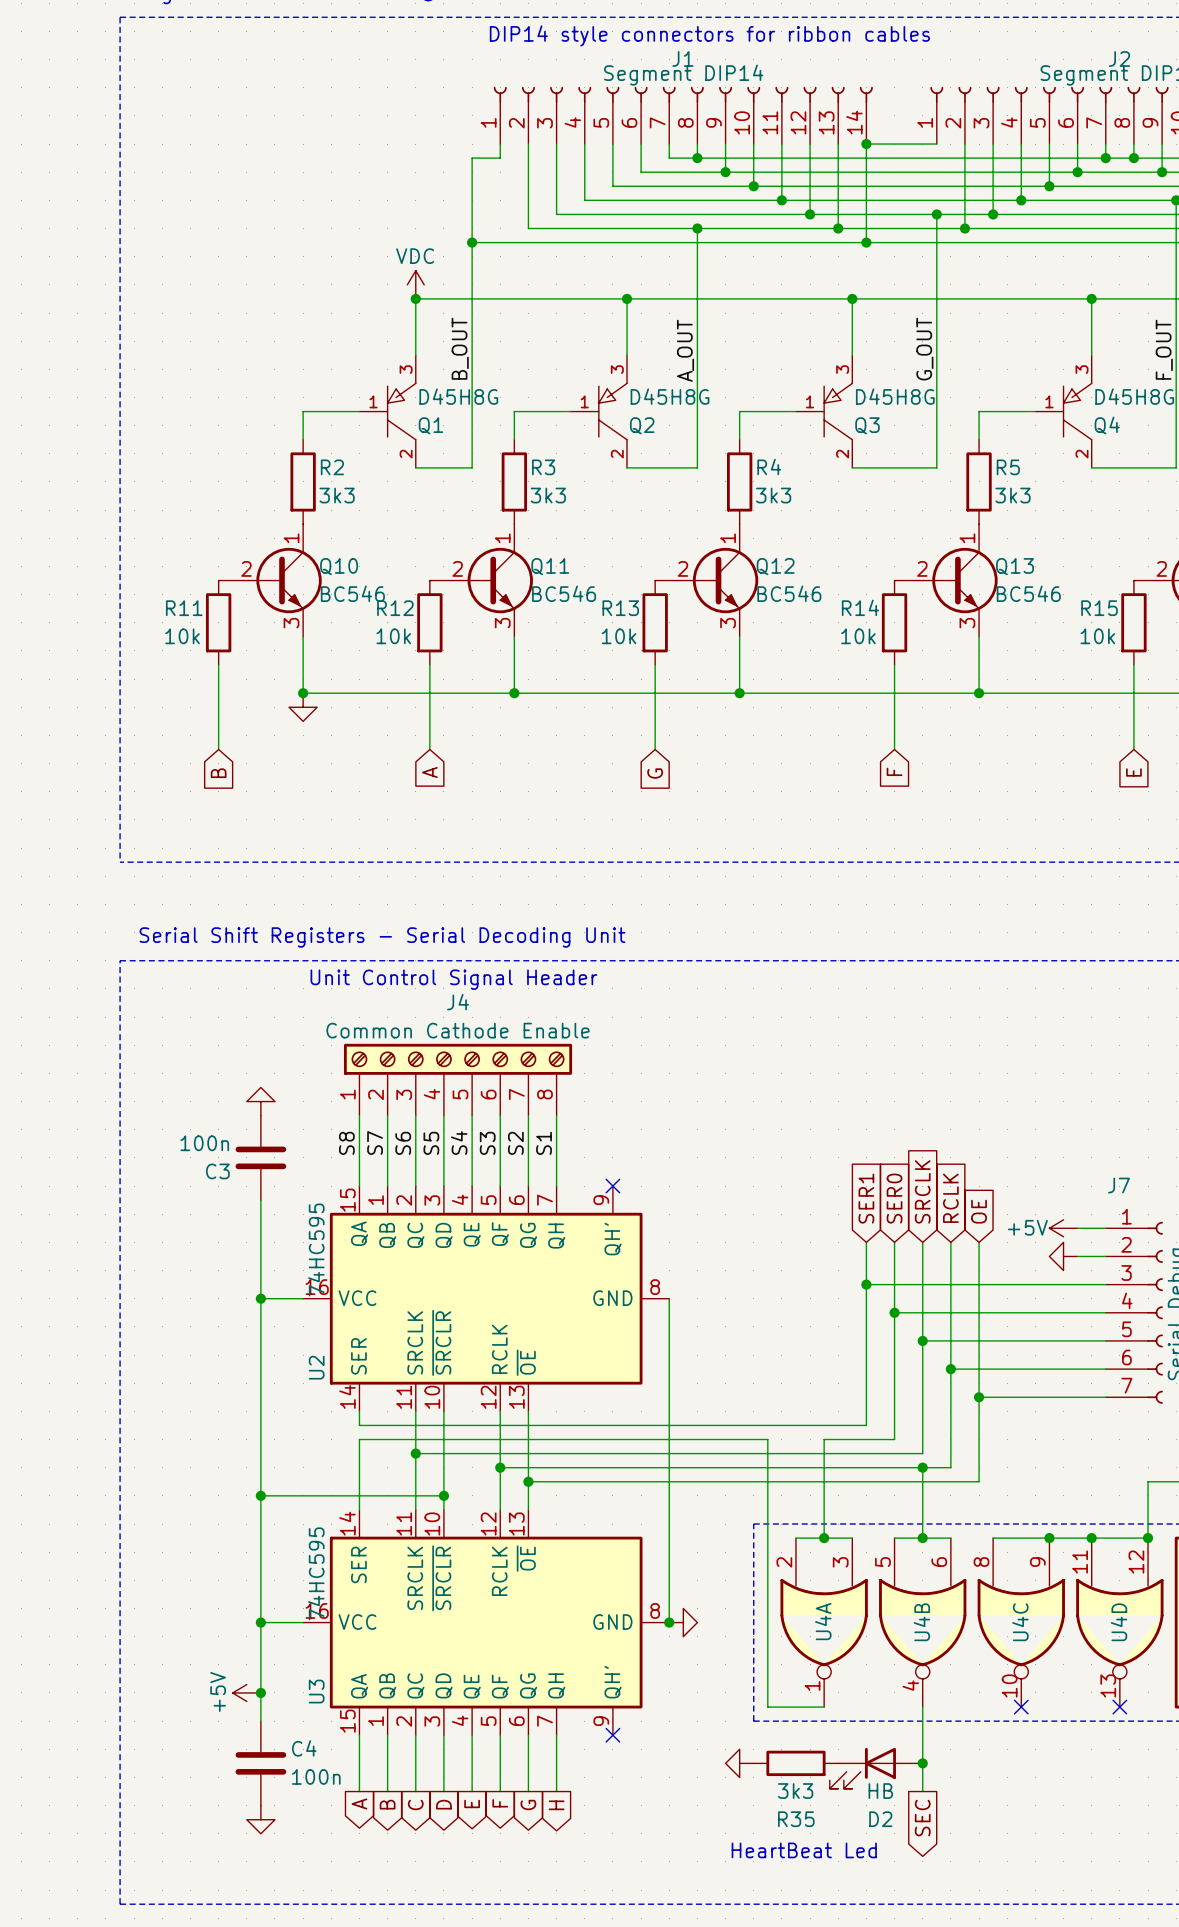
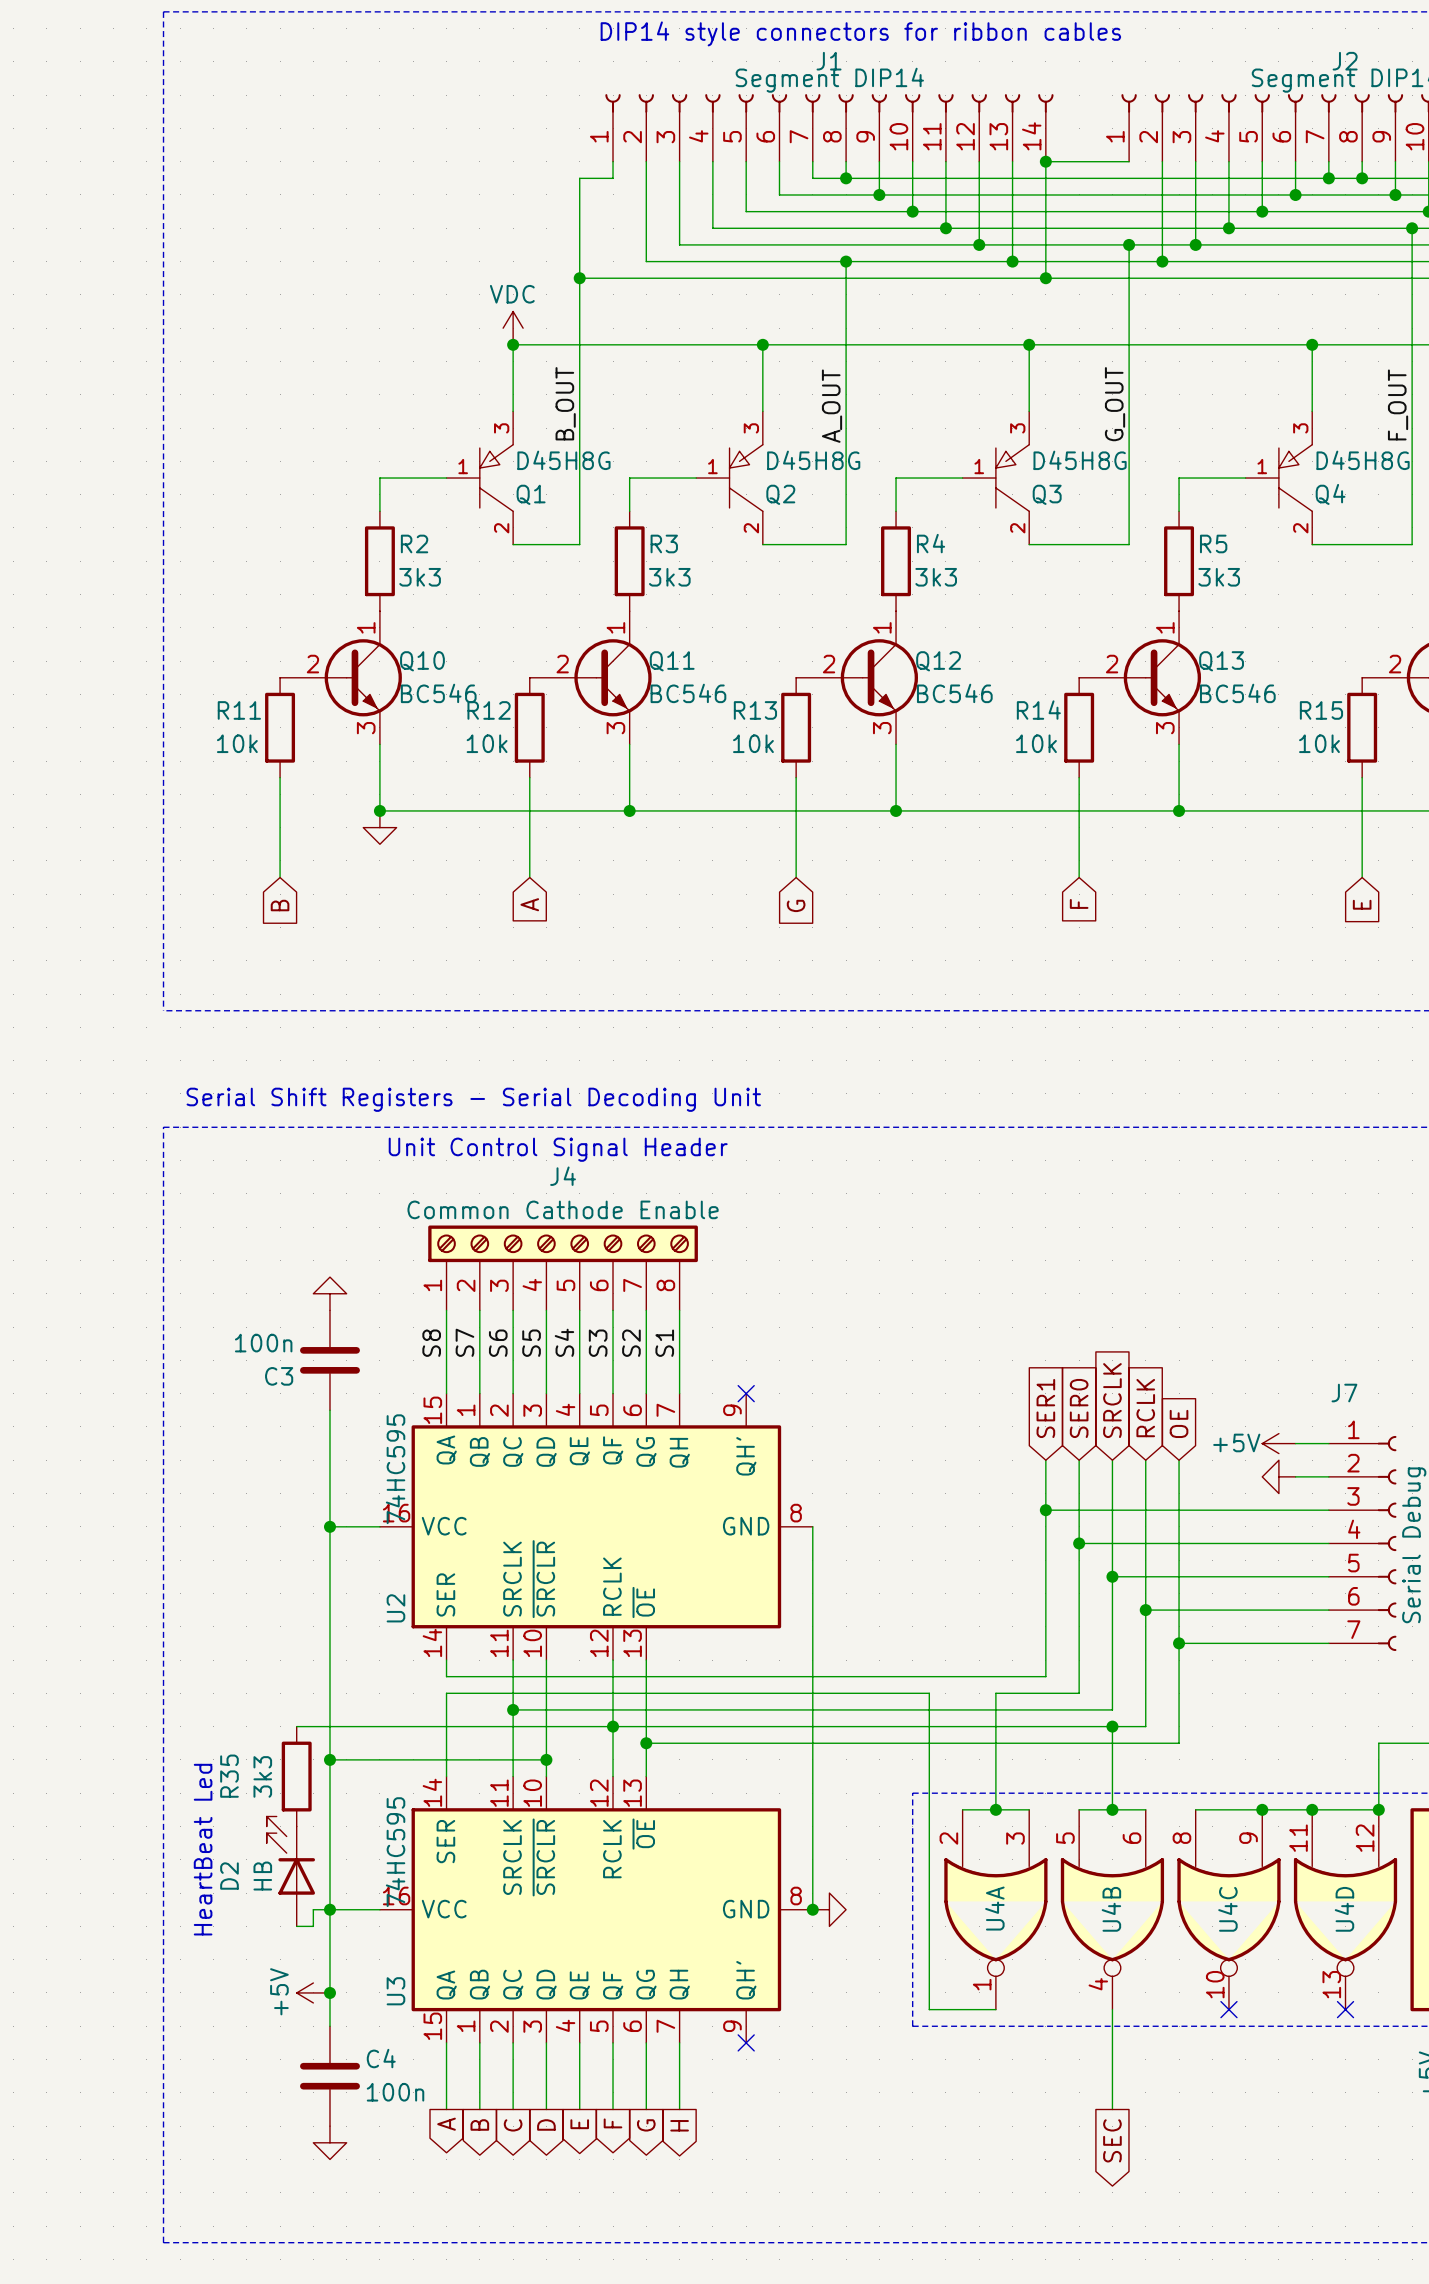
wire: none -> (296, 1726) (613, 1726)
text: none -> HeartBeat Led (203, 1849)
wire: none -> (329, 1909) (313, 1909) (313, 1926) (296, 1926)
power symbol: (739, 1763) -> none
R35 rotation: 0° (795, 1763) -> 90° clockwise (296, 1776)
R35 position: (795, 1763) -> (296, 1776)
junction: (922, 1763) -> none
D2 rotation: 0° (862, 1768) -> 90° clockwise (290, 1855)
D2 position: (876, 1768) -> (290, 1871)
text: HeartBeat Led (804, 1850) -> none

